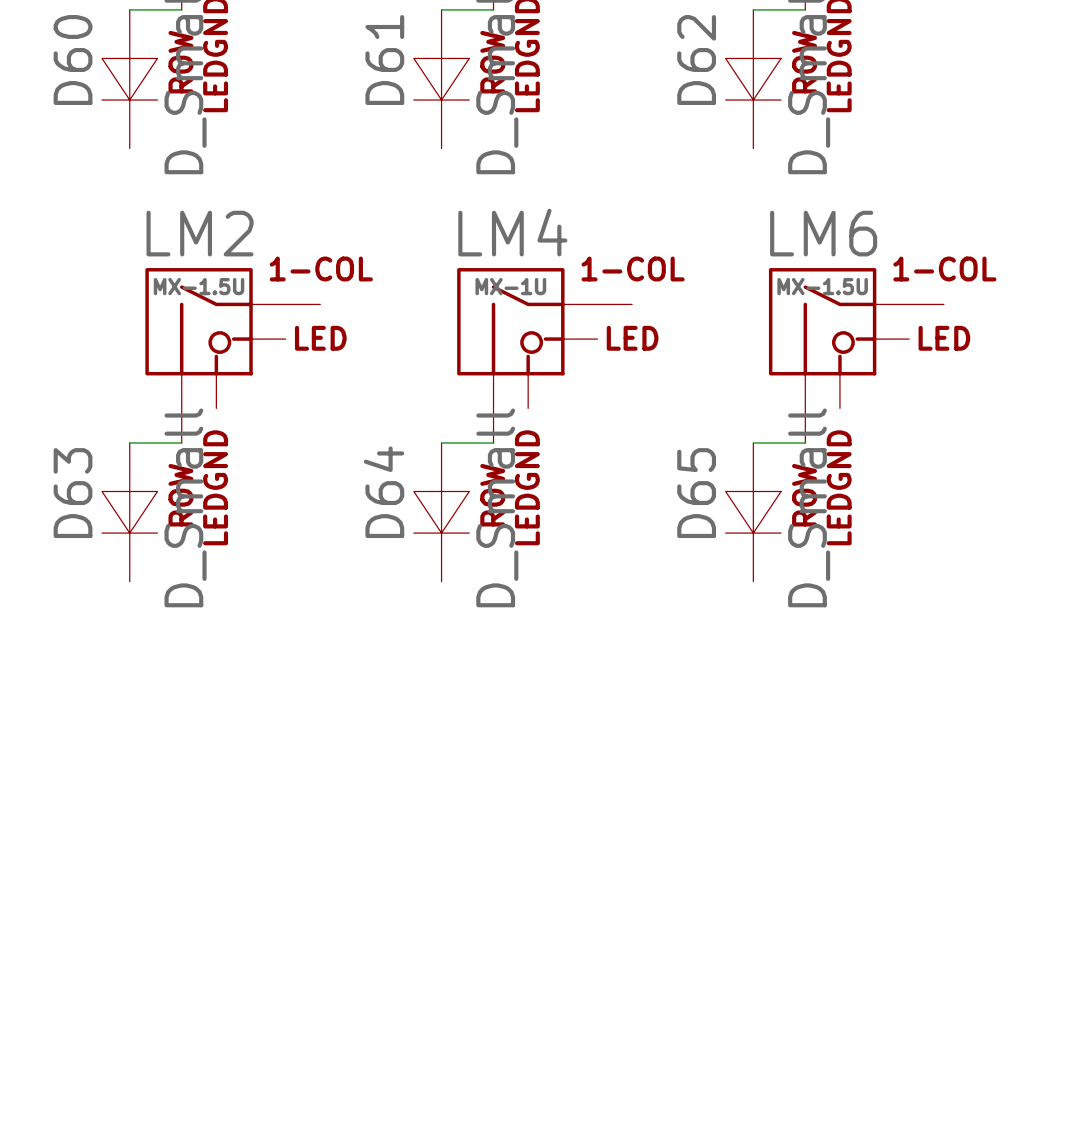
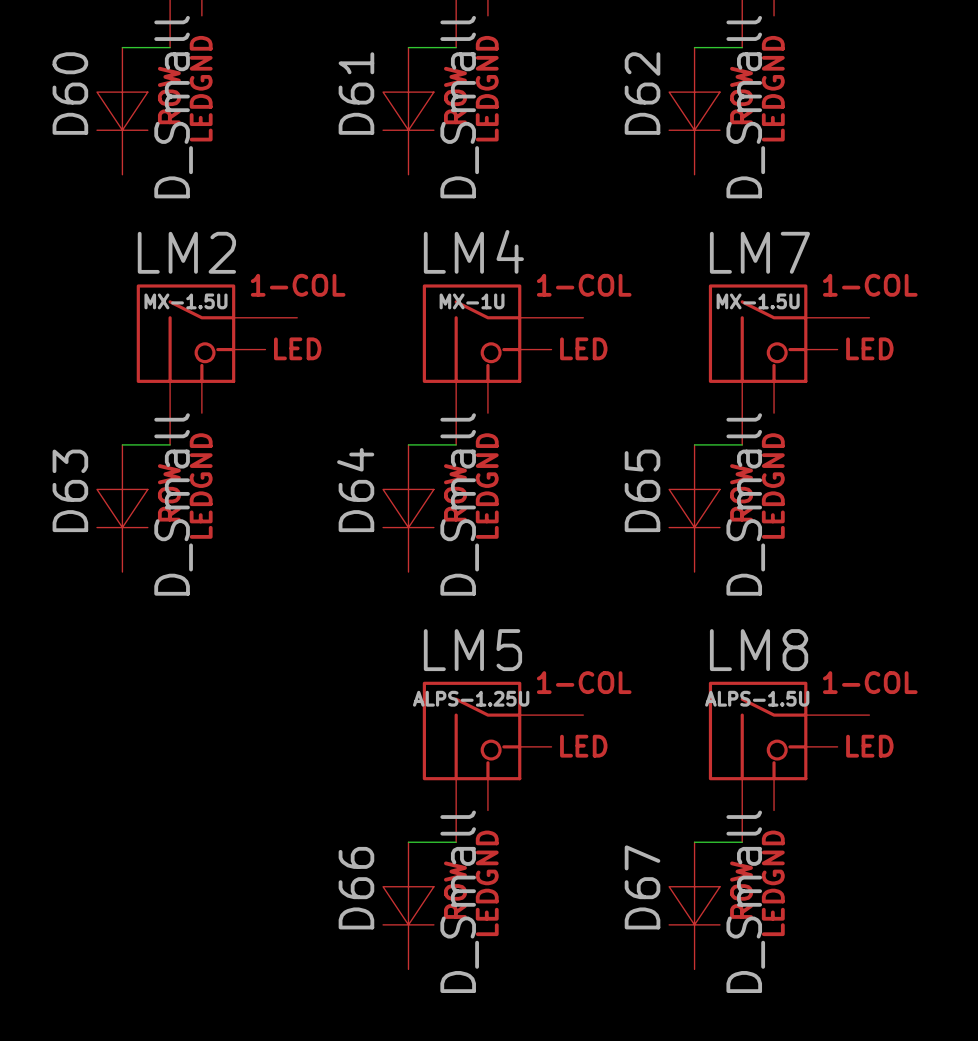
LM6 name: LM6 (823, 233) -> LM7 (759, 252)
LM5: none -> ALPS-1.25U (503, 761)
LM8: none -> ALPS-1.5U (789, 761)
wire: none -> (408, 842) (456, 842)
wire: none -> (694, 842) (742, 842)
D66: none -> D_Small (408, 905)
D67: none -> D_Small (694, 905)

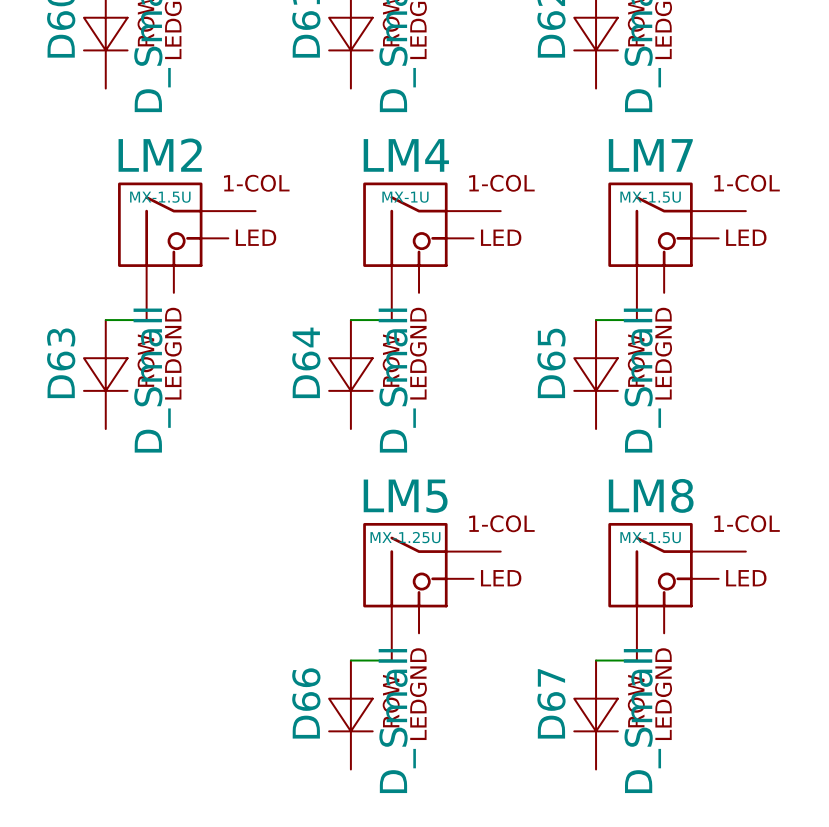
LM5 value: ALPS-1.25U (471, 698) -> MX-1.25U (405, 537)
LM8 value: ALPS-1.5U (757, 698) -> MX-1.5U (650, 537)

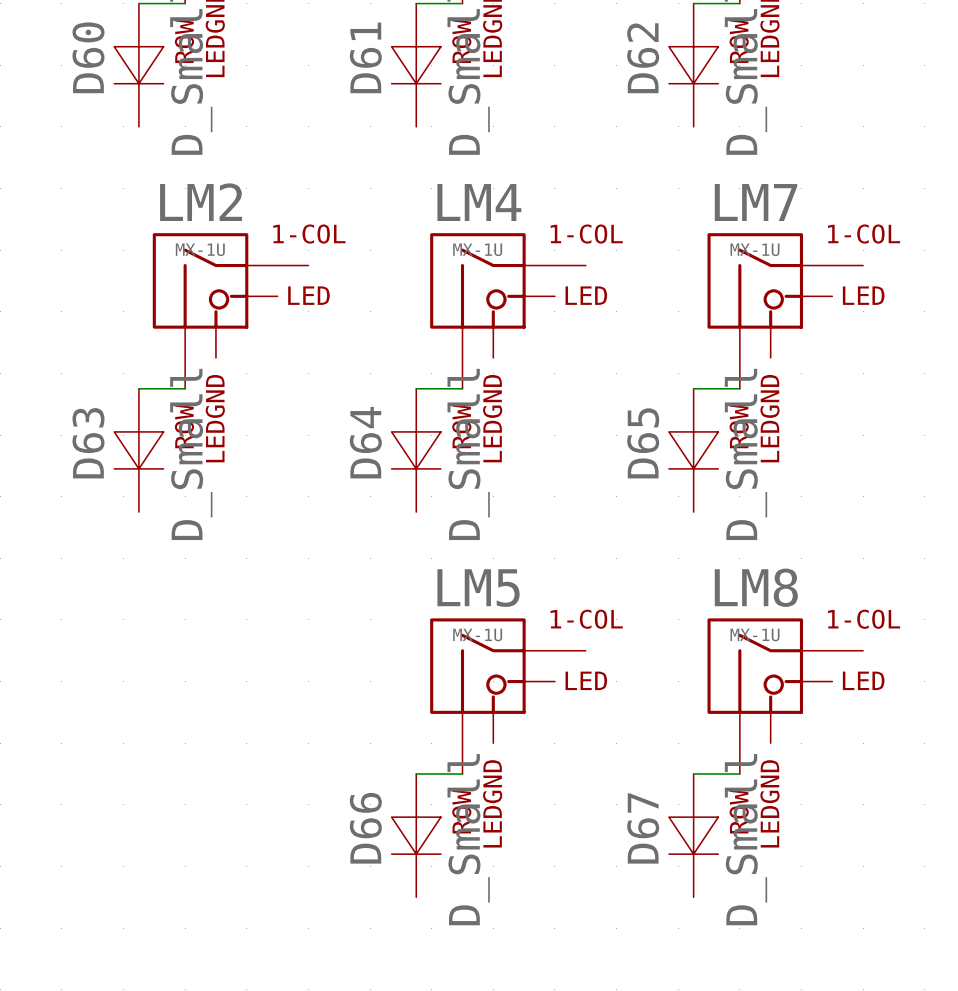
LM2 value: MX-1.5U (160, 197) -> MX-1U (200, 249)
LM7 value: MX-1.5U (650, 197) -> MX-1U (755, 249)
LM5 value: MX-1.25U (405, 537) -> MX-1U (477, 634)
LM8 value: MX-1.5U (650, 537) -> MX-1U (755, 634)

